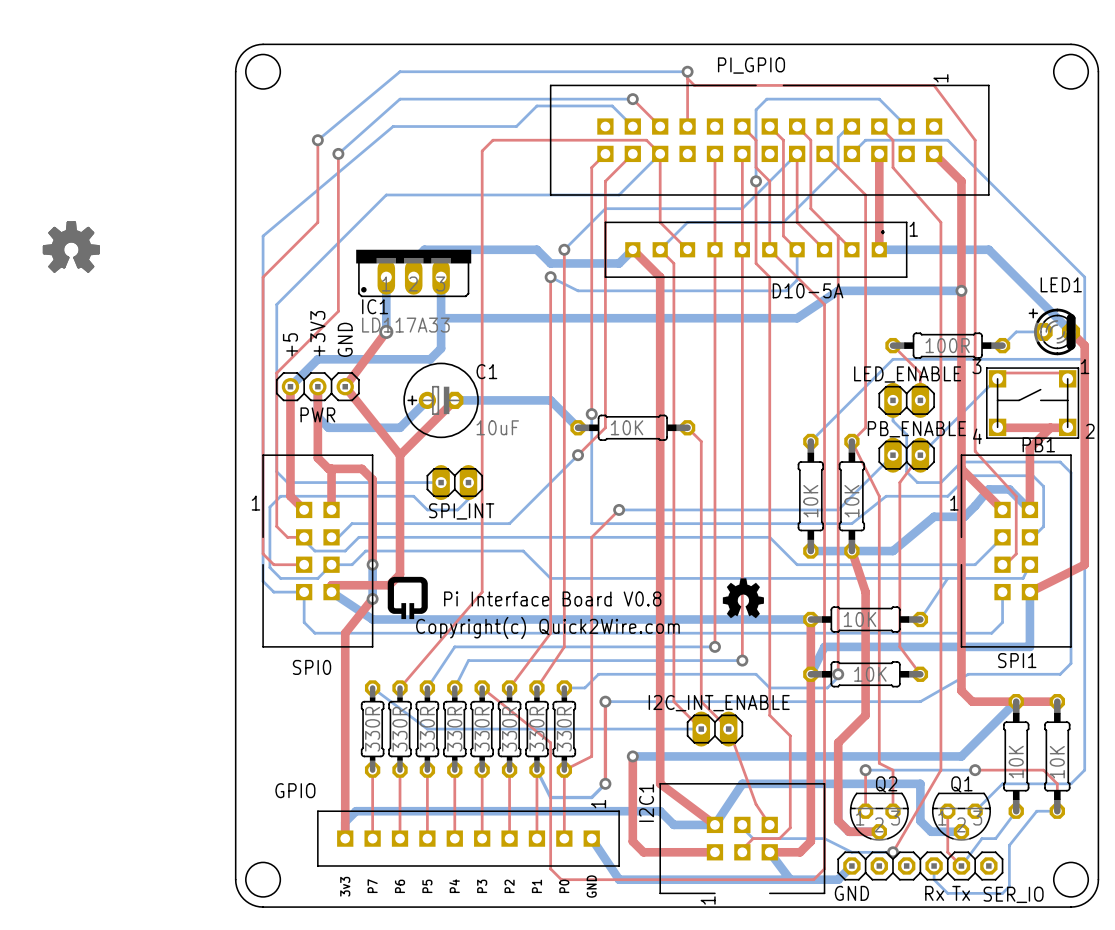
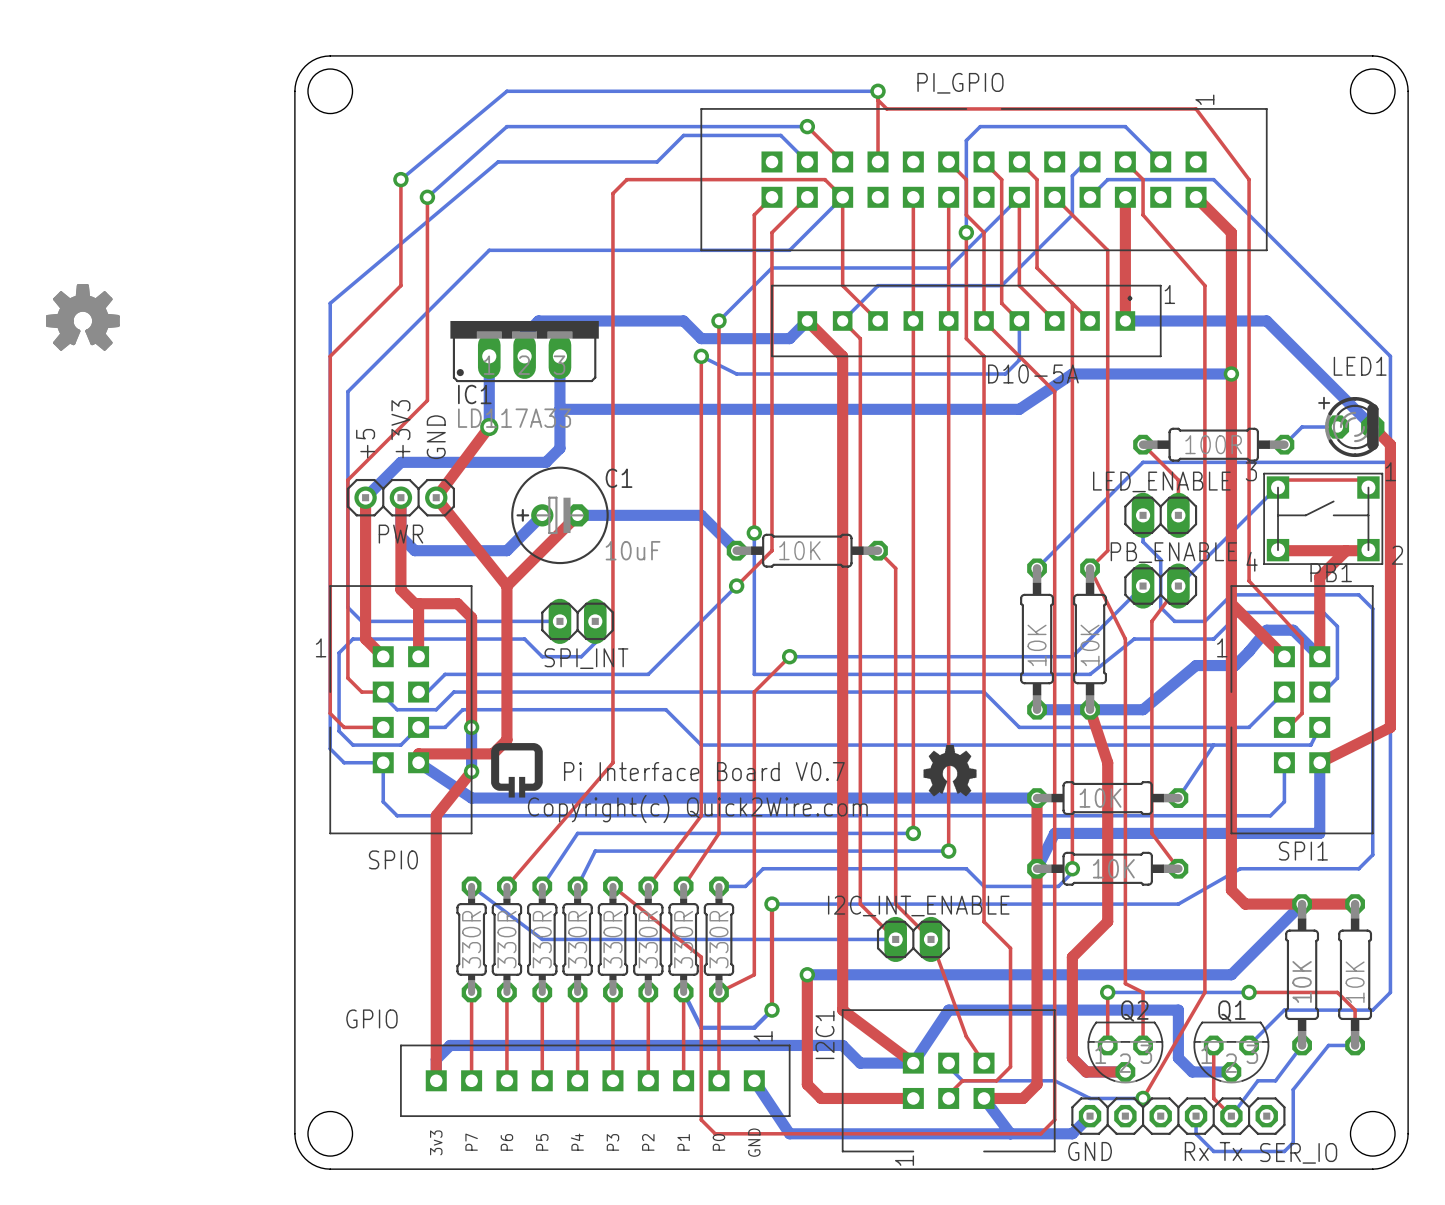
text: Pi Interface Board V0.8 (552, 598) -> Pi Interface Board V0.7 (704, 771)

